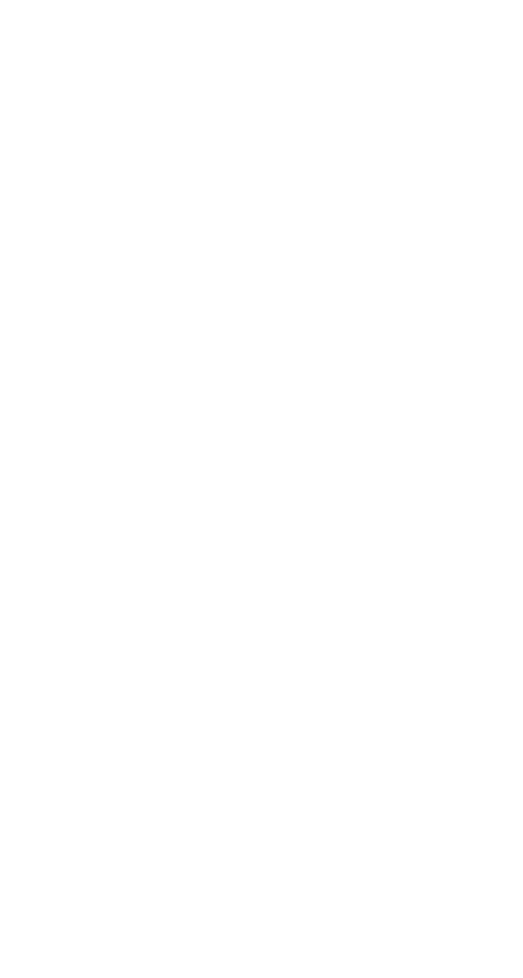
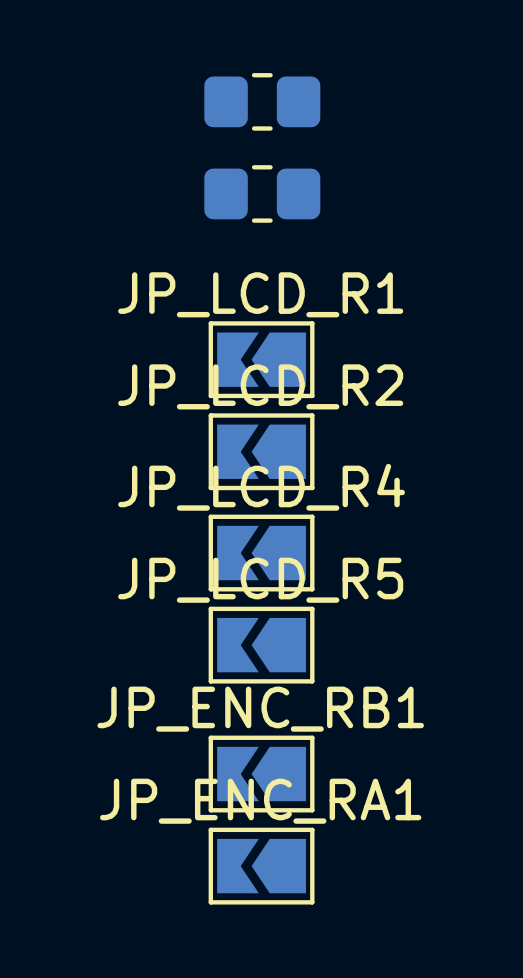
part: none -> (262, 101)
part: none -> (262, 193)
JP_LCD_R1: none -> (261, 359)
JP_LCD_R2: none -> (261, 451)
JP_LCD_R4: none -> (261, 553)
JP_LCD_R5: none -> (261, 645)
JP_ENC_RB1: none -> (261, 774)
JP_ENC_RA1: none -> (261, 866)

